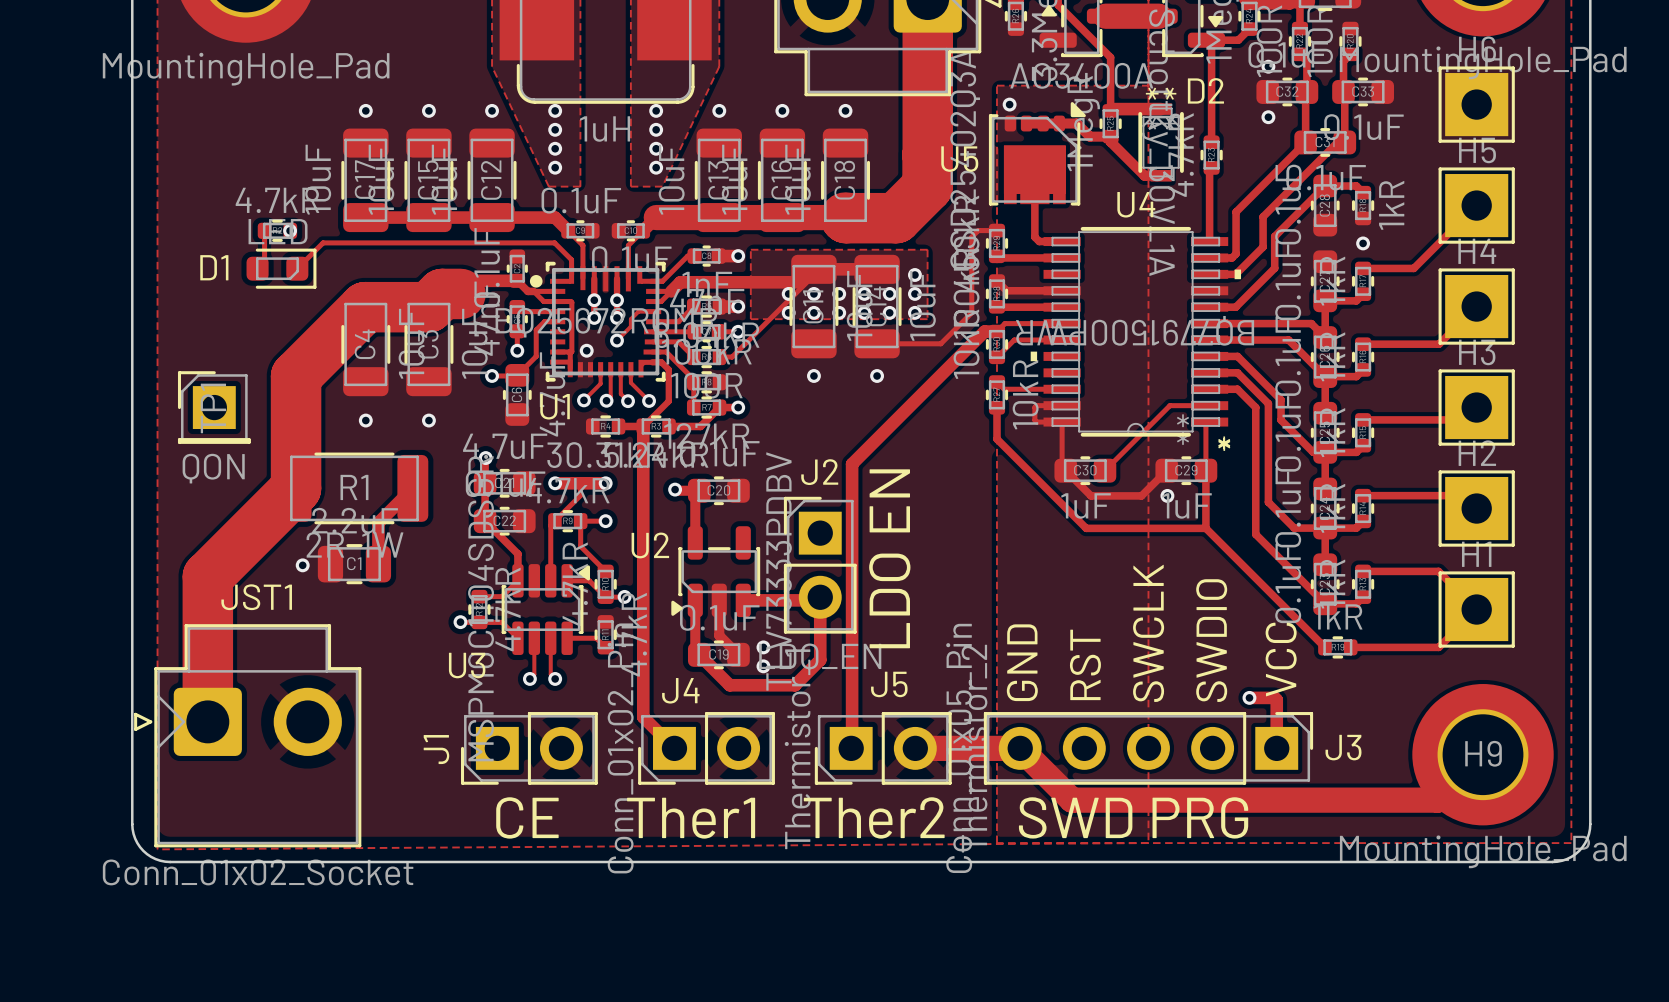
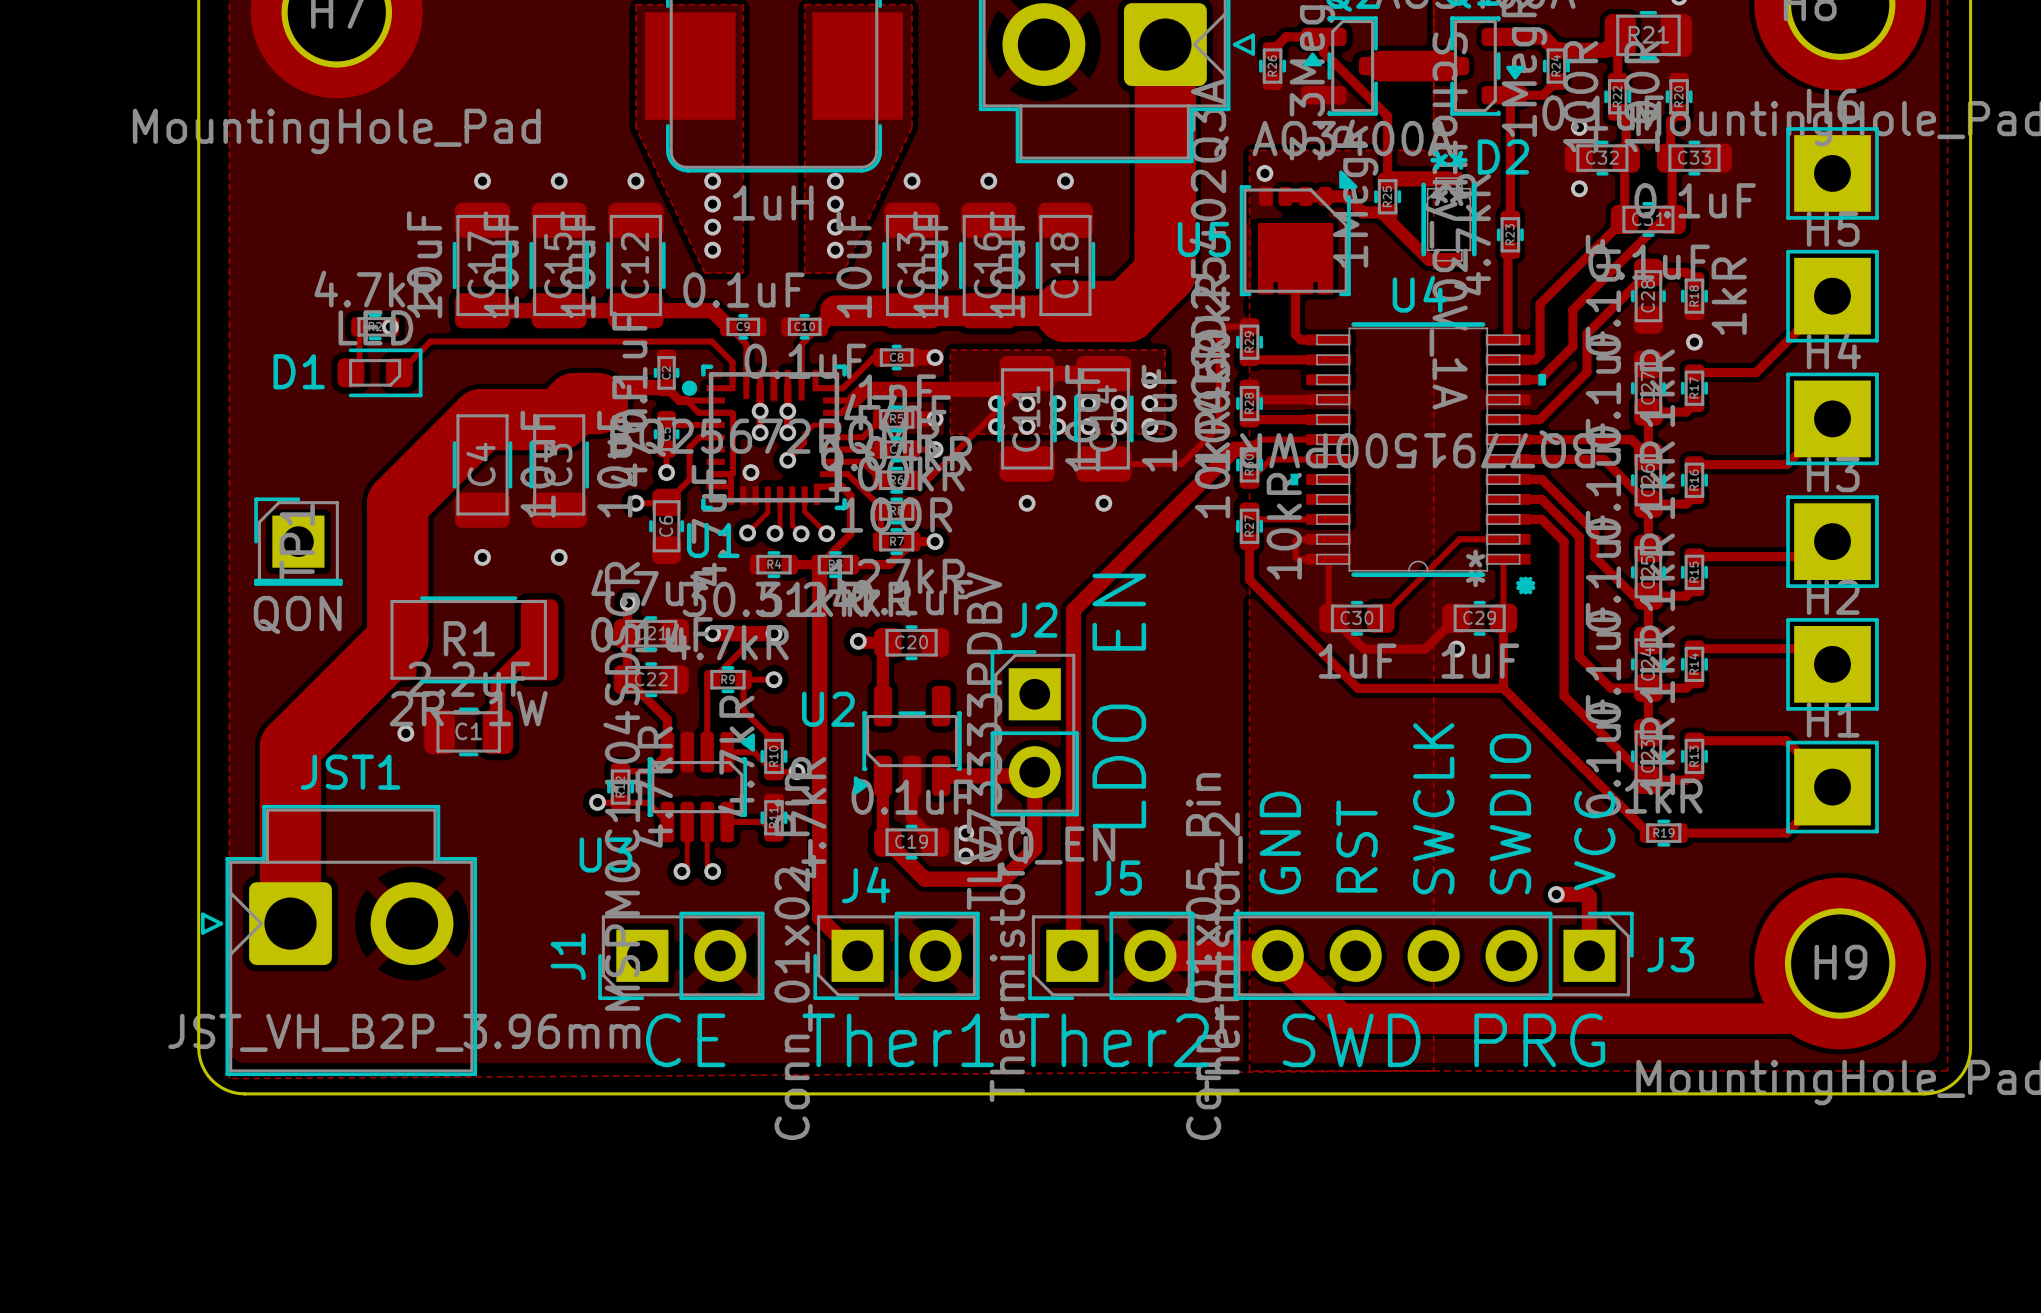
JST1 value: Conn_01x02_Socket (258, 872) -> JST_VH_B2P_3.96mm (404, 1032)

